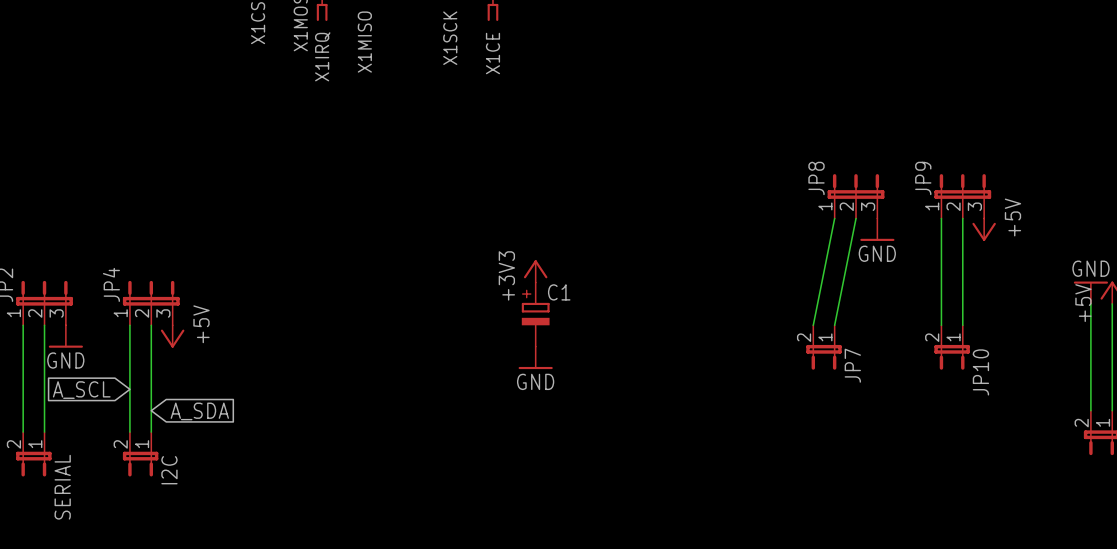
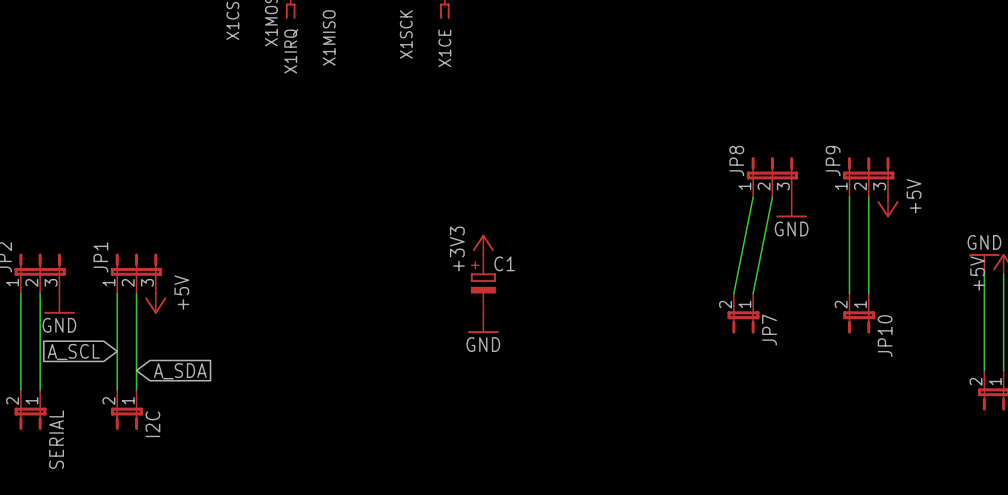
JP4 name: JP4 (111, 284) -> JP1 (100, 257)

